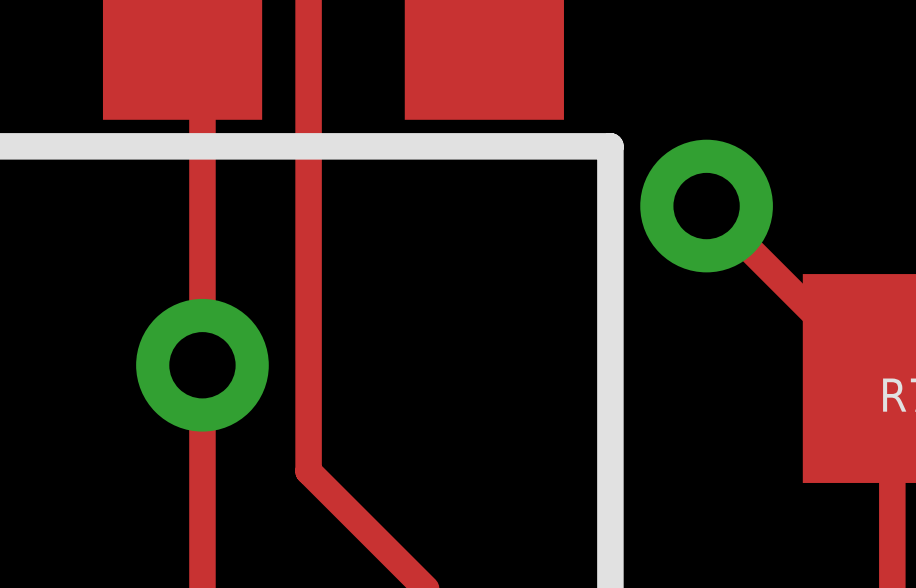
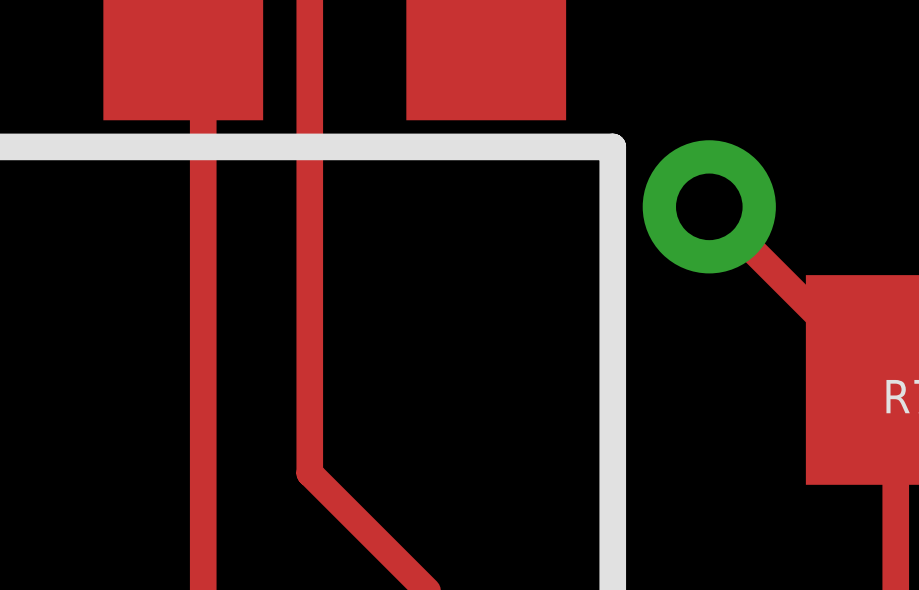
via: (202, 365) -> none

